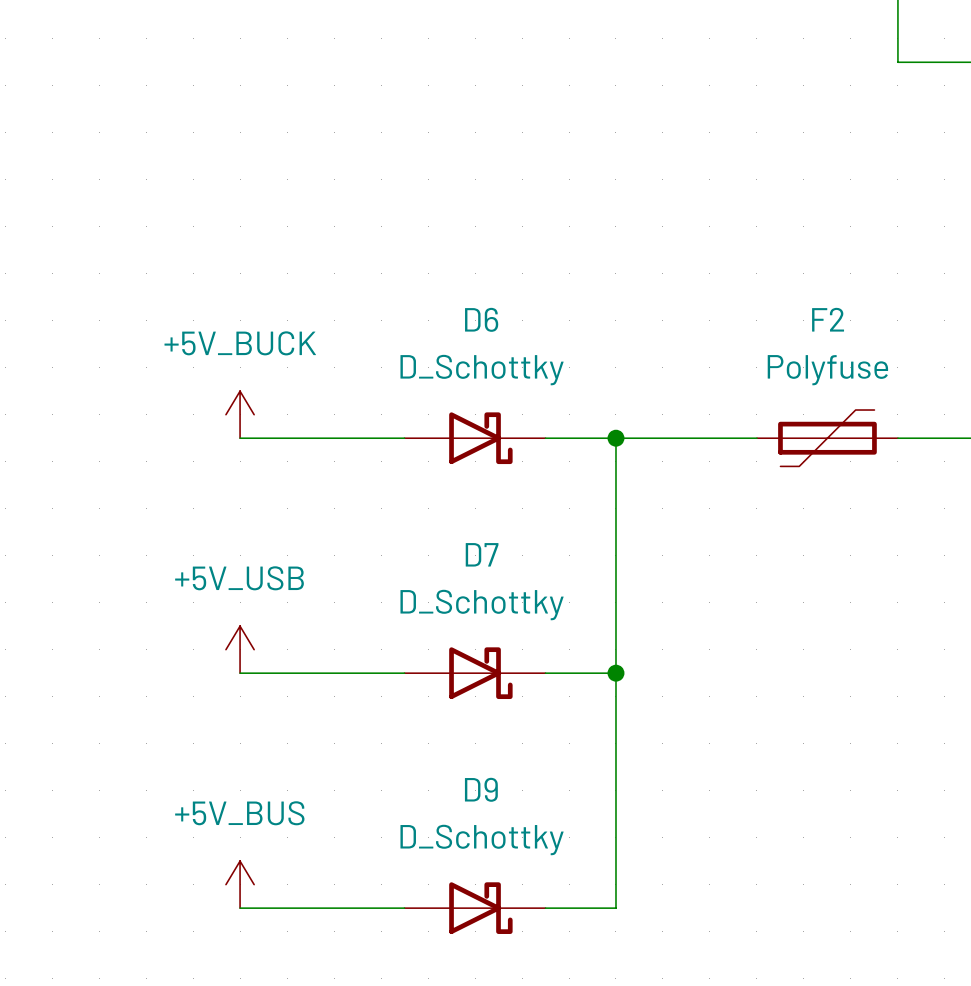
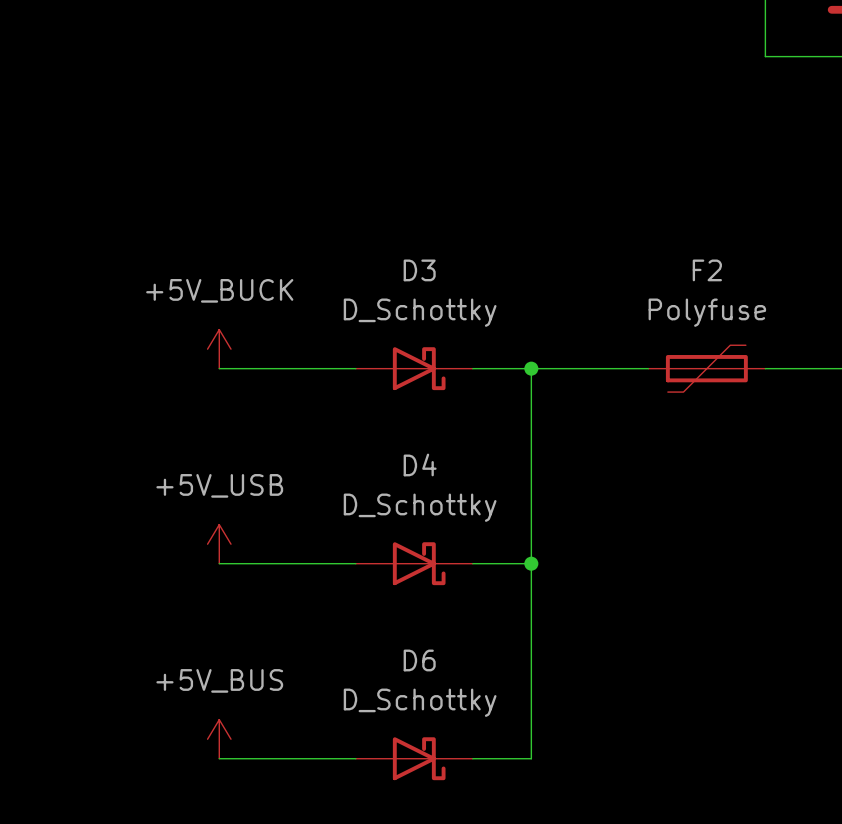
D6 name: D6 (481, 319) -> D3 (419, 270)
D7 name: D7 (482, 554) -> D4 (420, 464)
D9 name: D9 (481, 789) -> D6 (419, 660)

